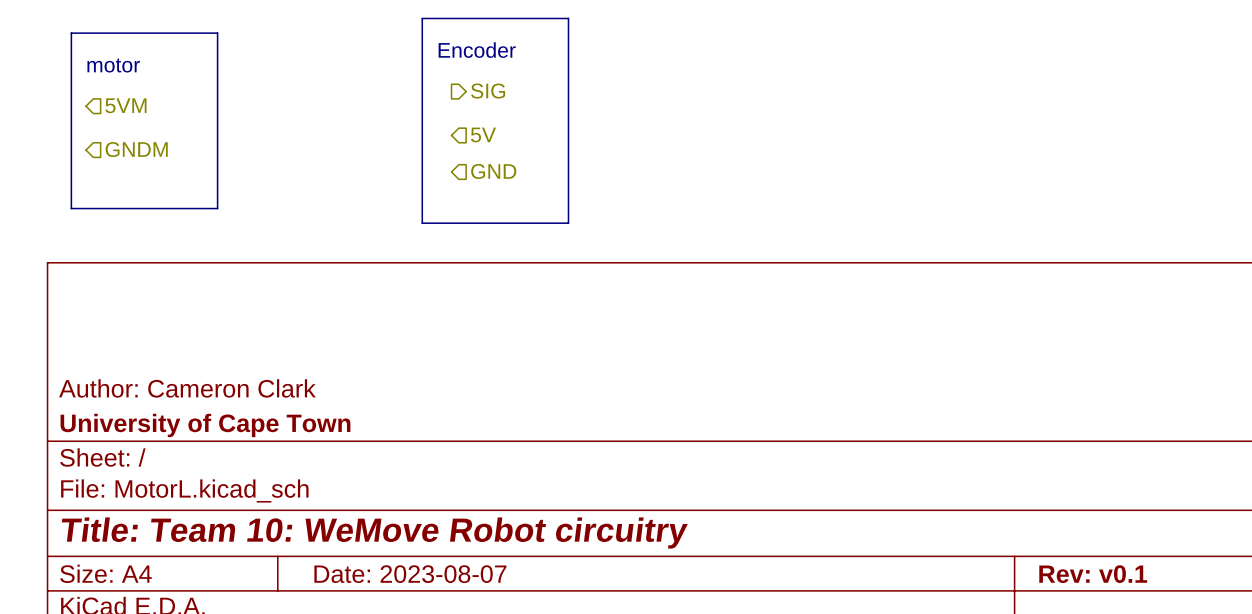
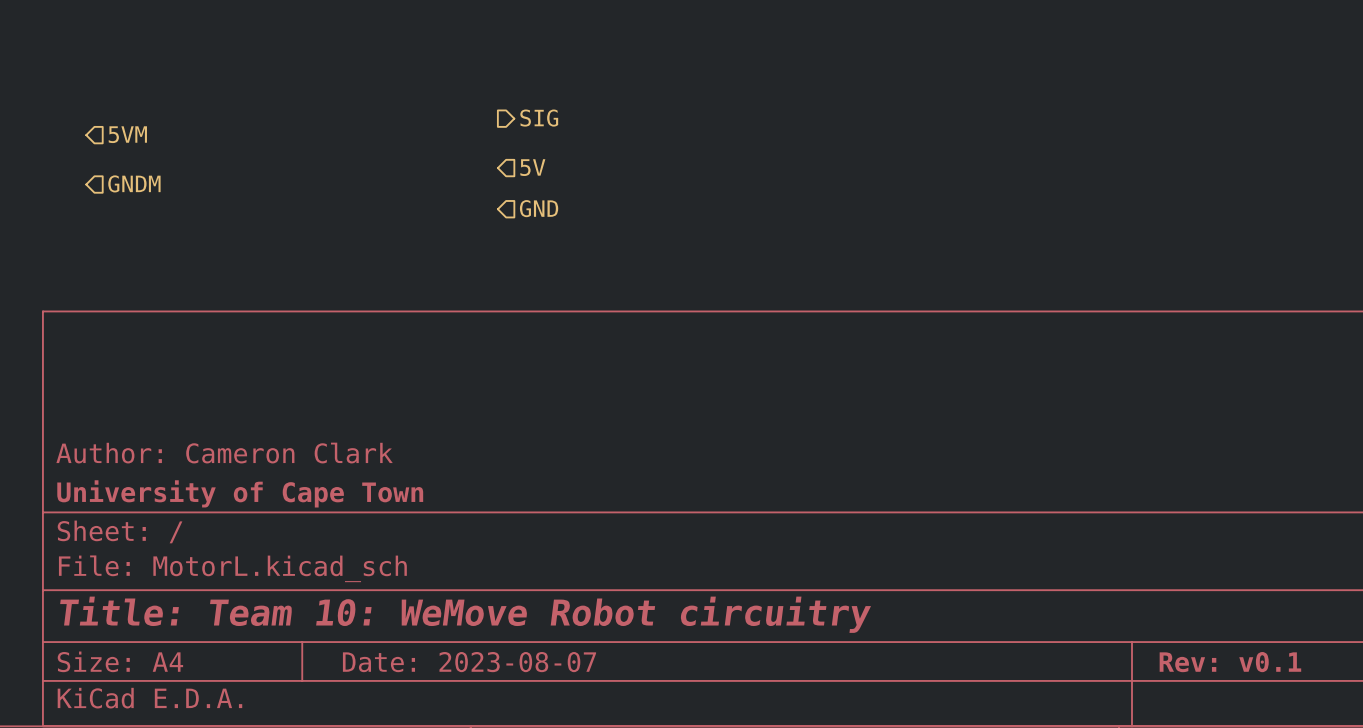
line: (422, 18) (568, 18) (568, 223) (422, 223) (422, 18) -> none
line: (71, 33) (217, 33) (217, 208) (71, 208) (71, 33) -> none
text: Encoder (477, 50) -> none
text: motor (113, 65) -> none

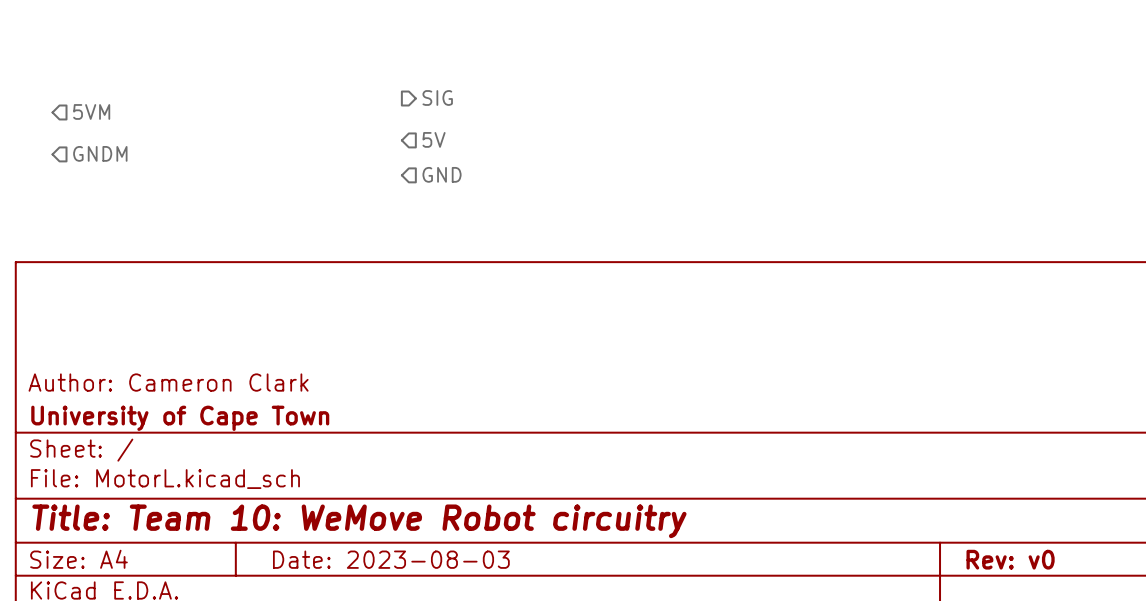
title block: Date: 2023-08-07 (469, 662) -> Date: 2023-08-03 (391, 559)
title block: Rev: v0.1 (1230, 662) -> Rev: v0 (1010, 559)

